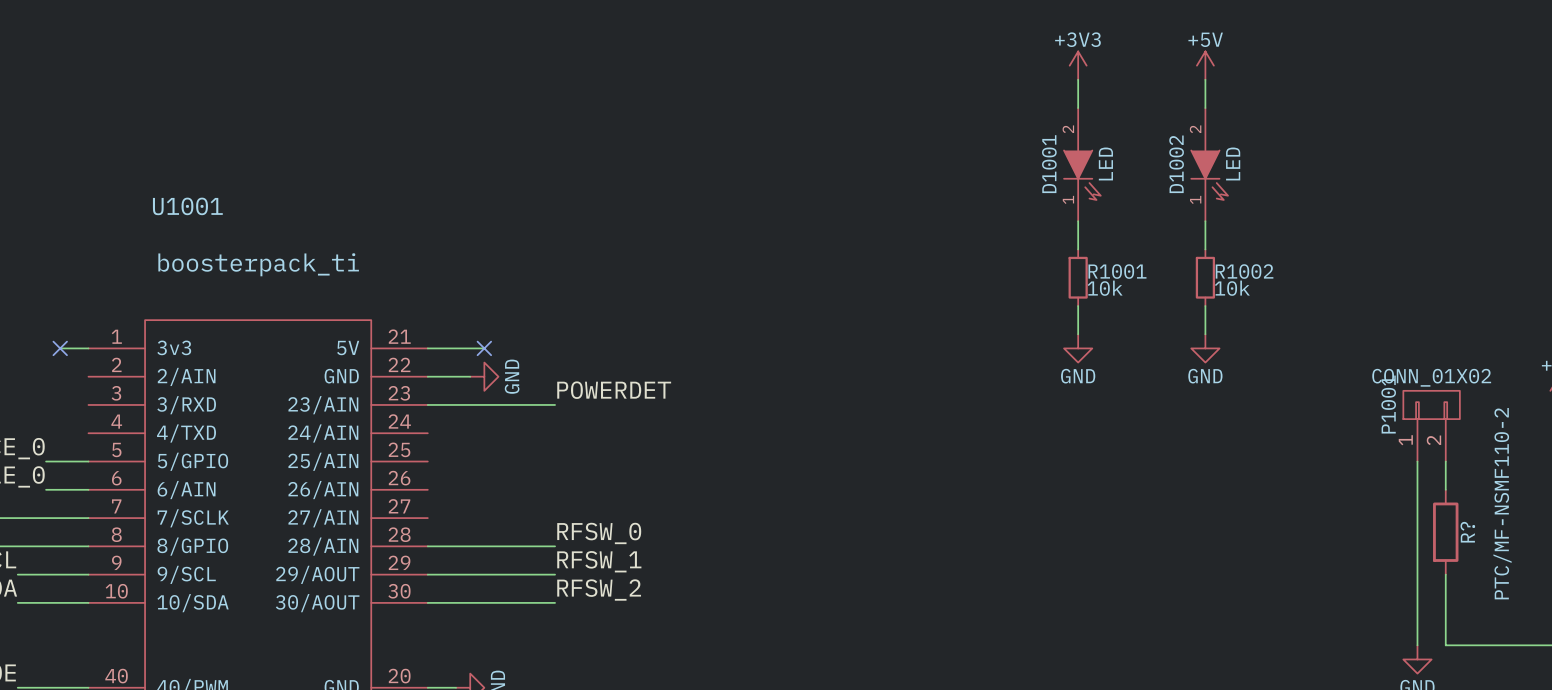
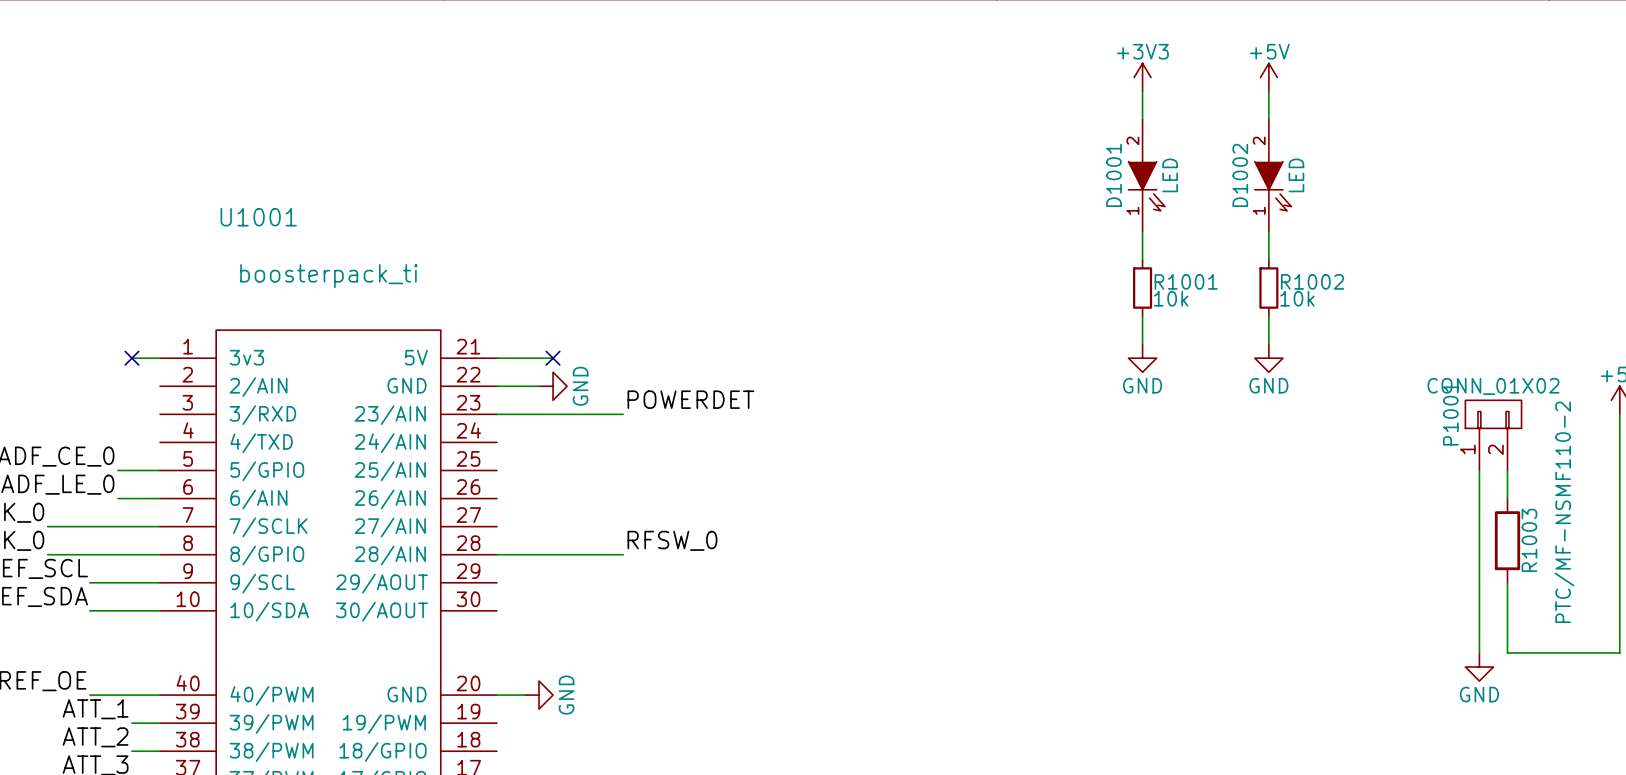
R? name: R? (1467, 532) -> R1003 (1529, 540)
label: RFSW_1 (599, 561) -> none
wire: (427, 574) (555, 574) -> none
label: RFSW_2 (599, 590) -> none
wire: (427, 602) (555, 602) -> none

